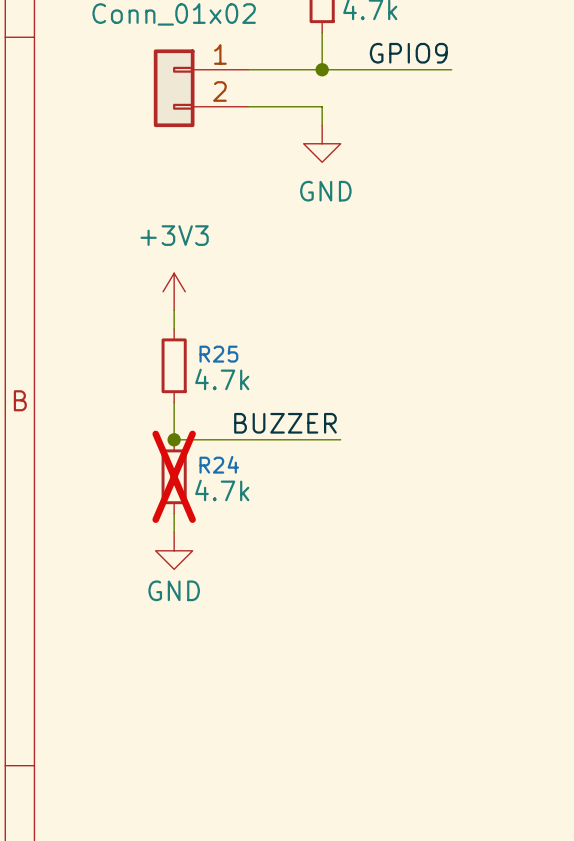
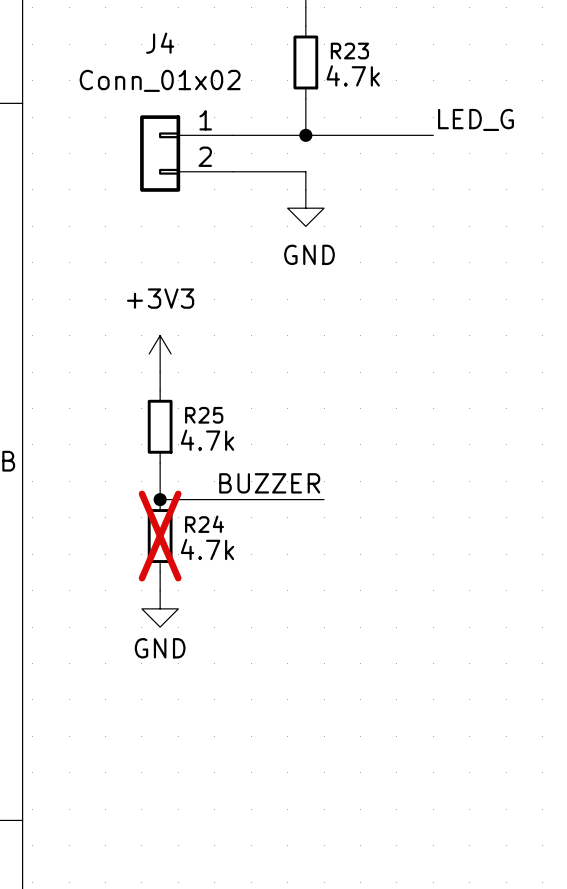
label: GPIO9 (408, 53) -> LED_G (475, 119)

